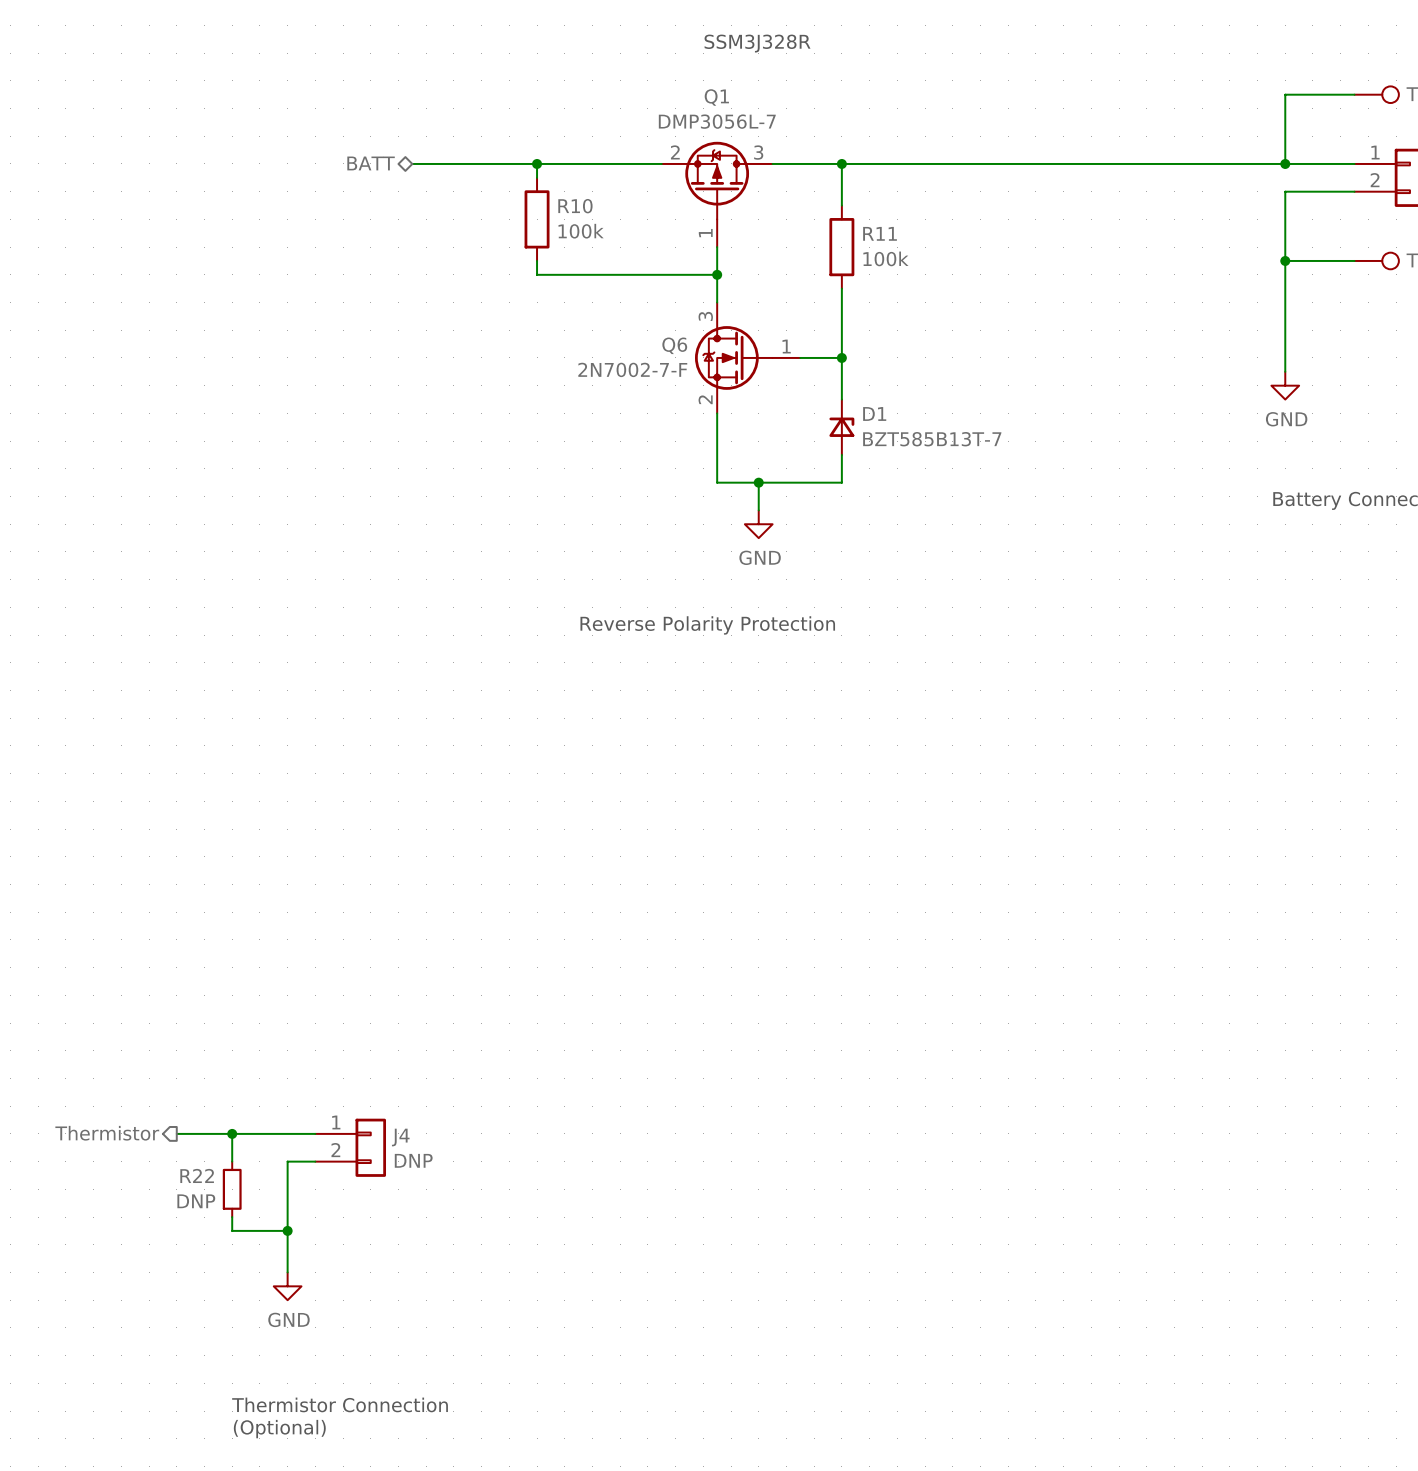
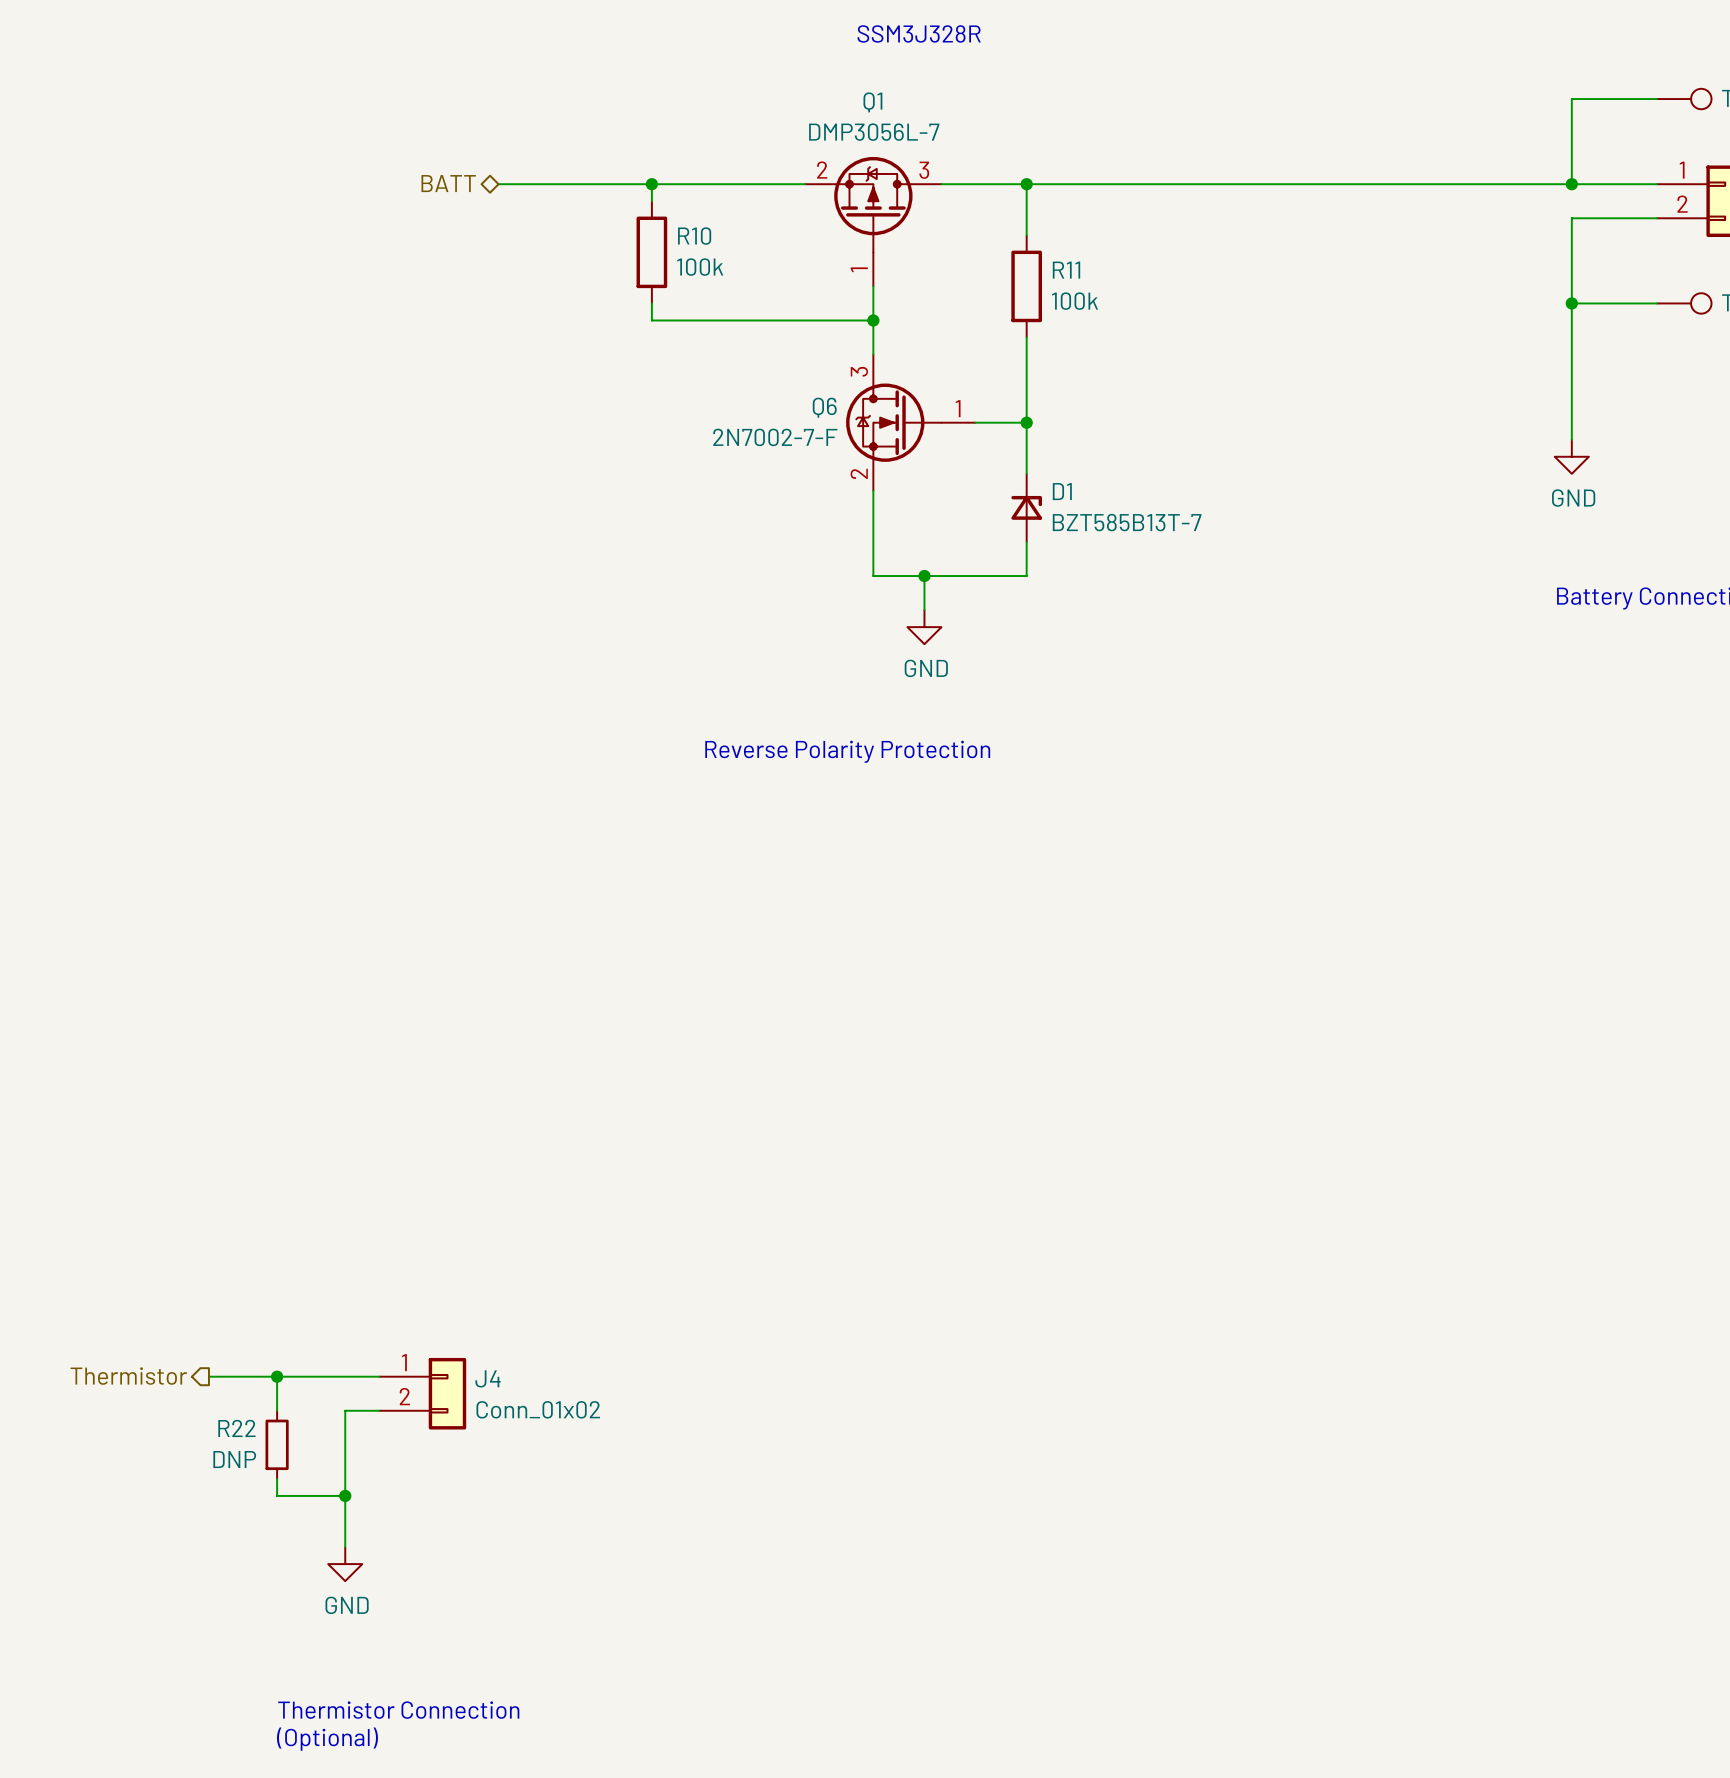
J4 value: DNP (413, 1160) -> Conn_01x02 (538, 1409)

